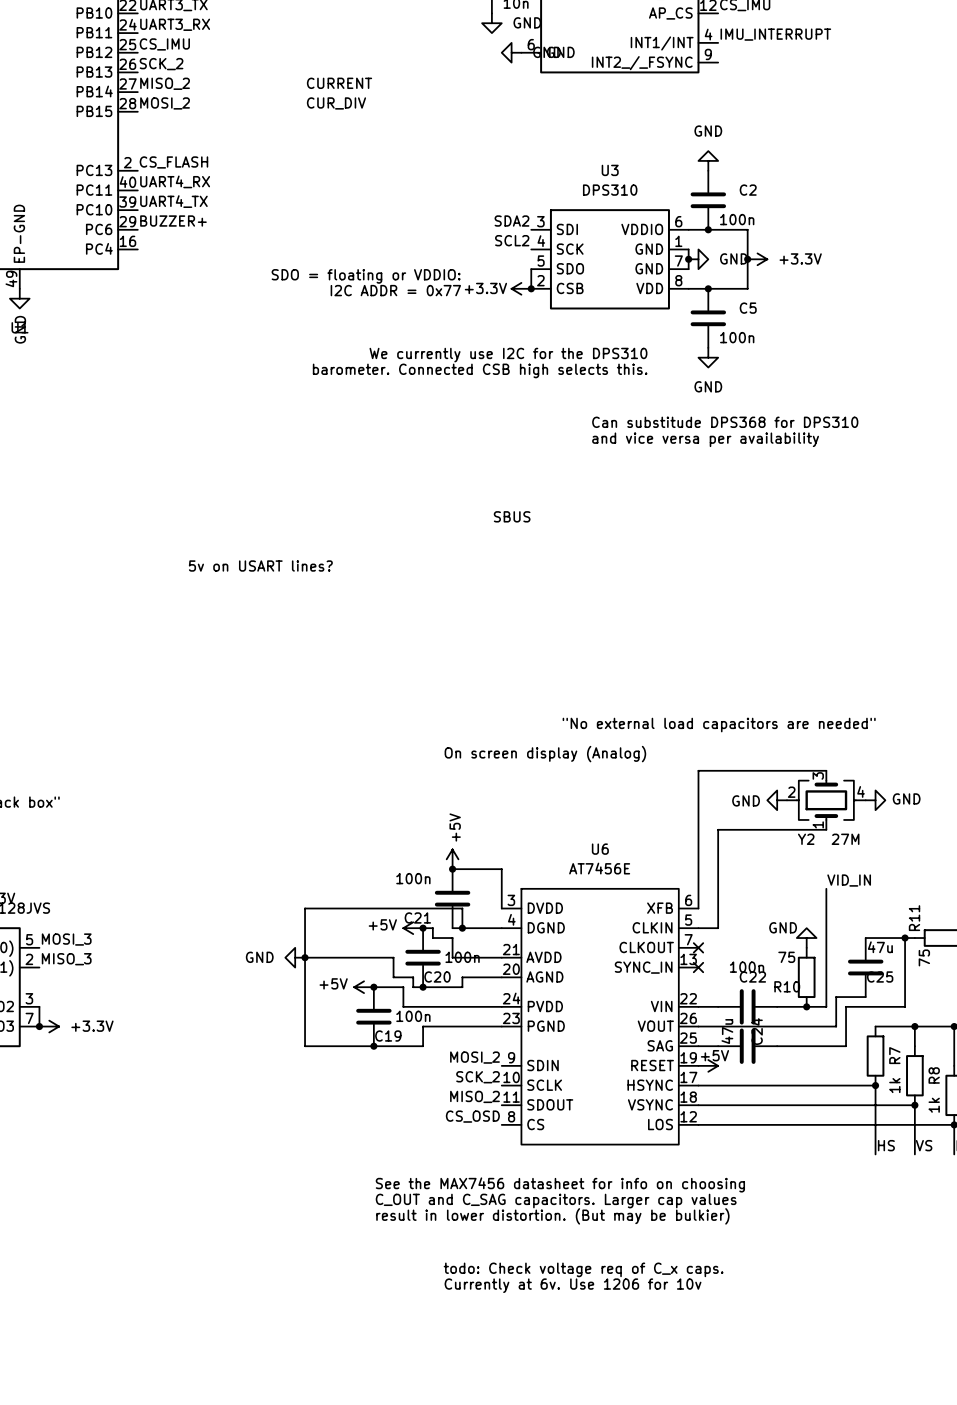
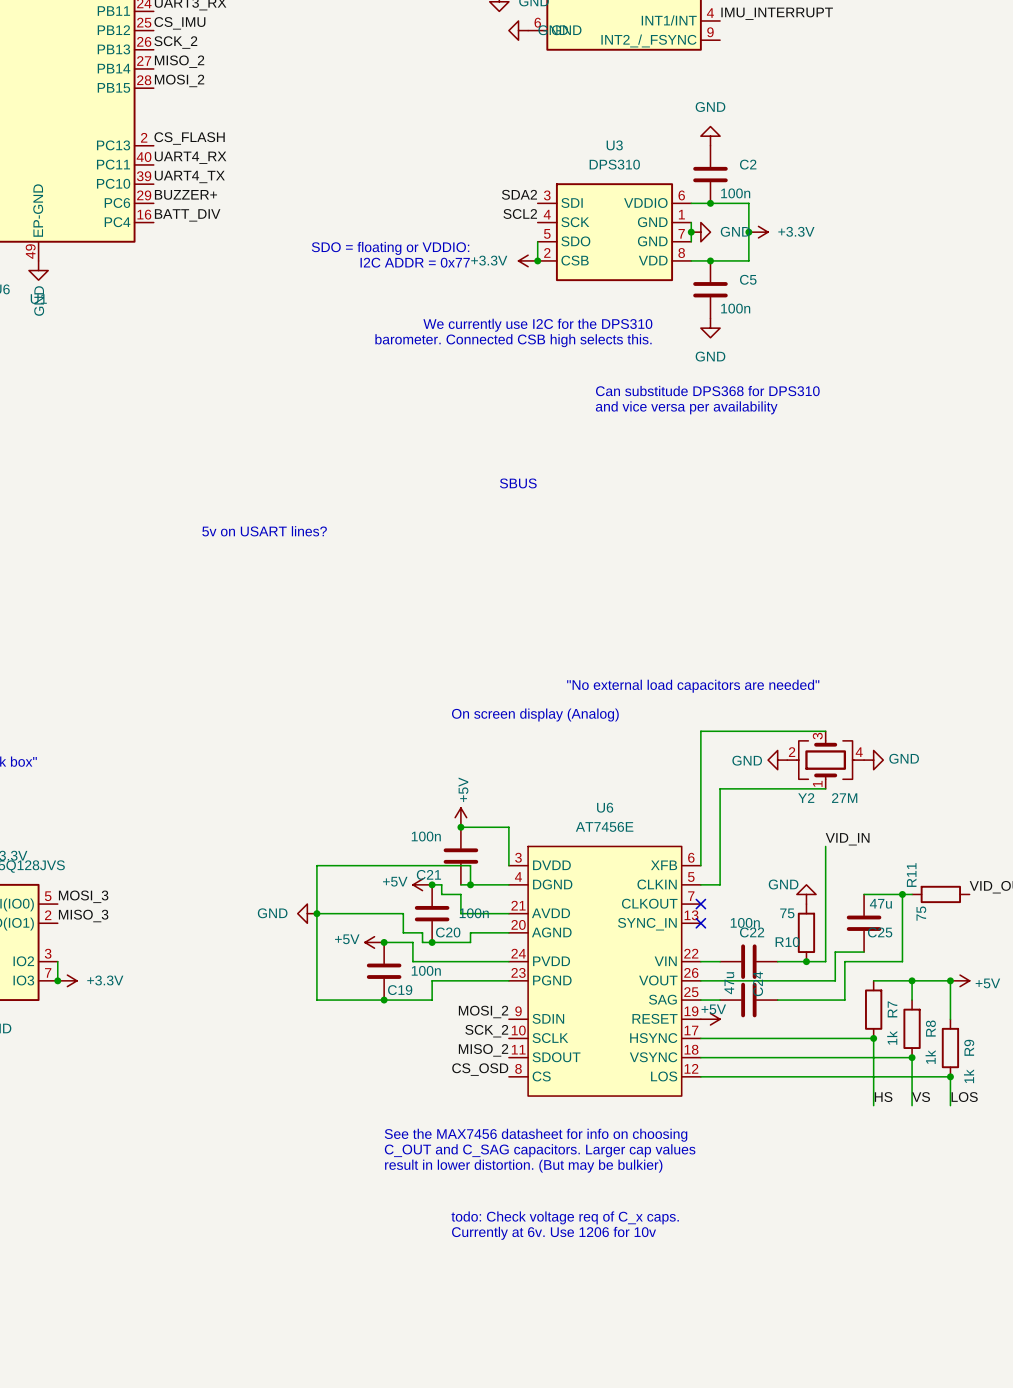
label: CURRENT (339, 83) -> none
label: CUR_DIV (336, 103) -> none
label: none -> BATT_DIV (187, 215)

